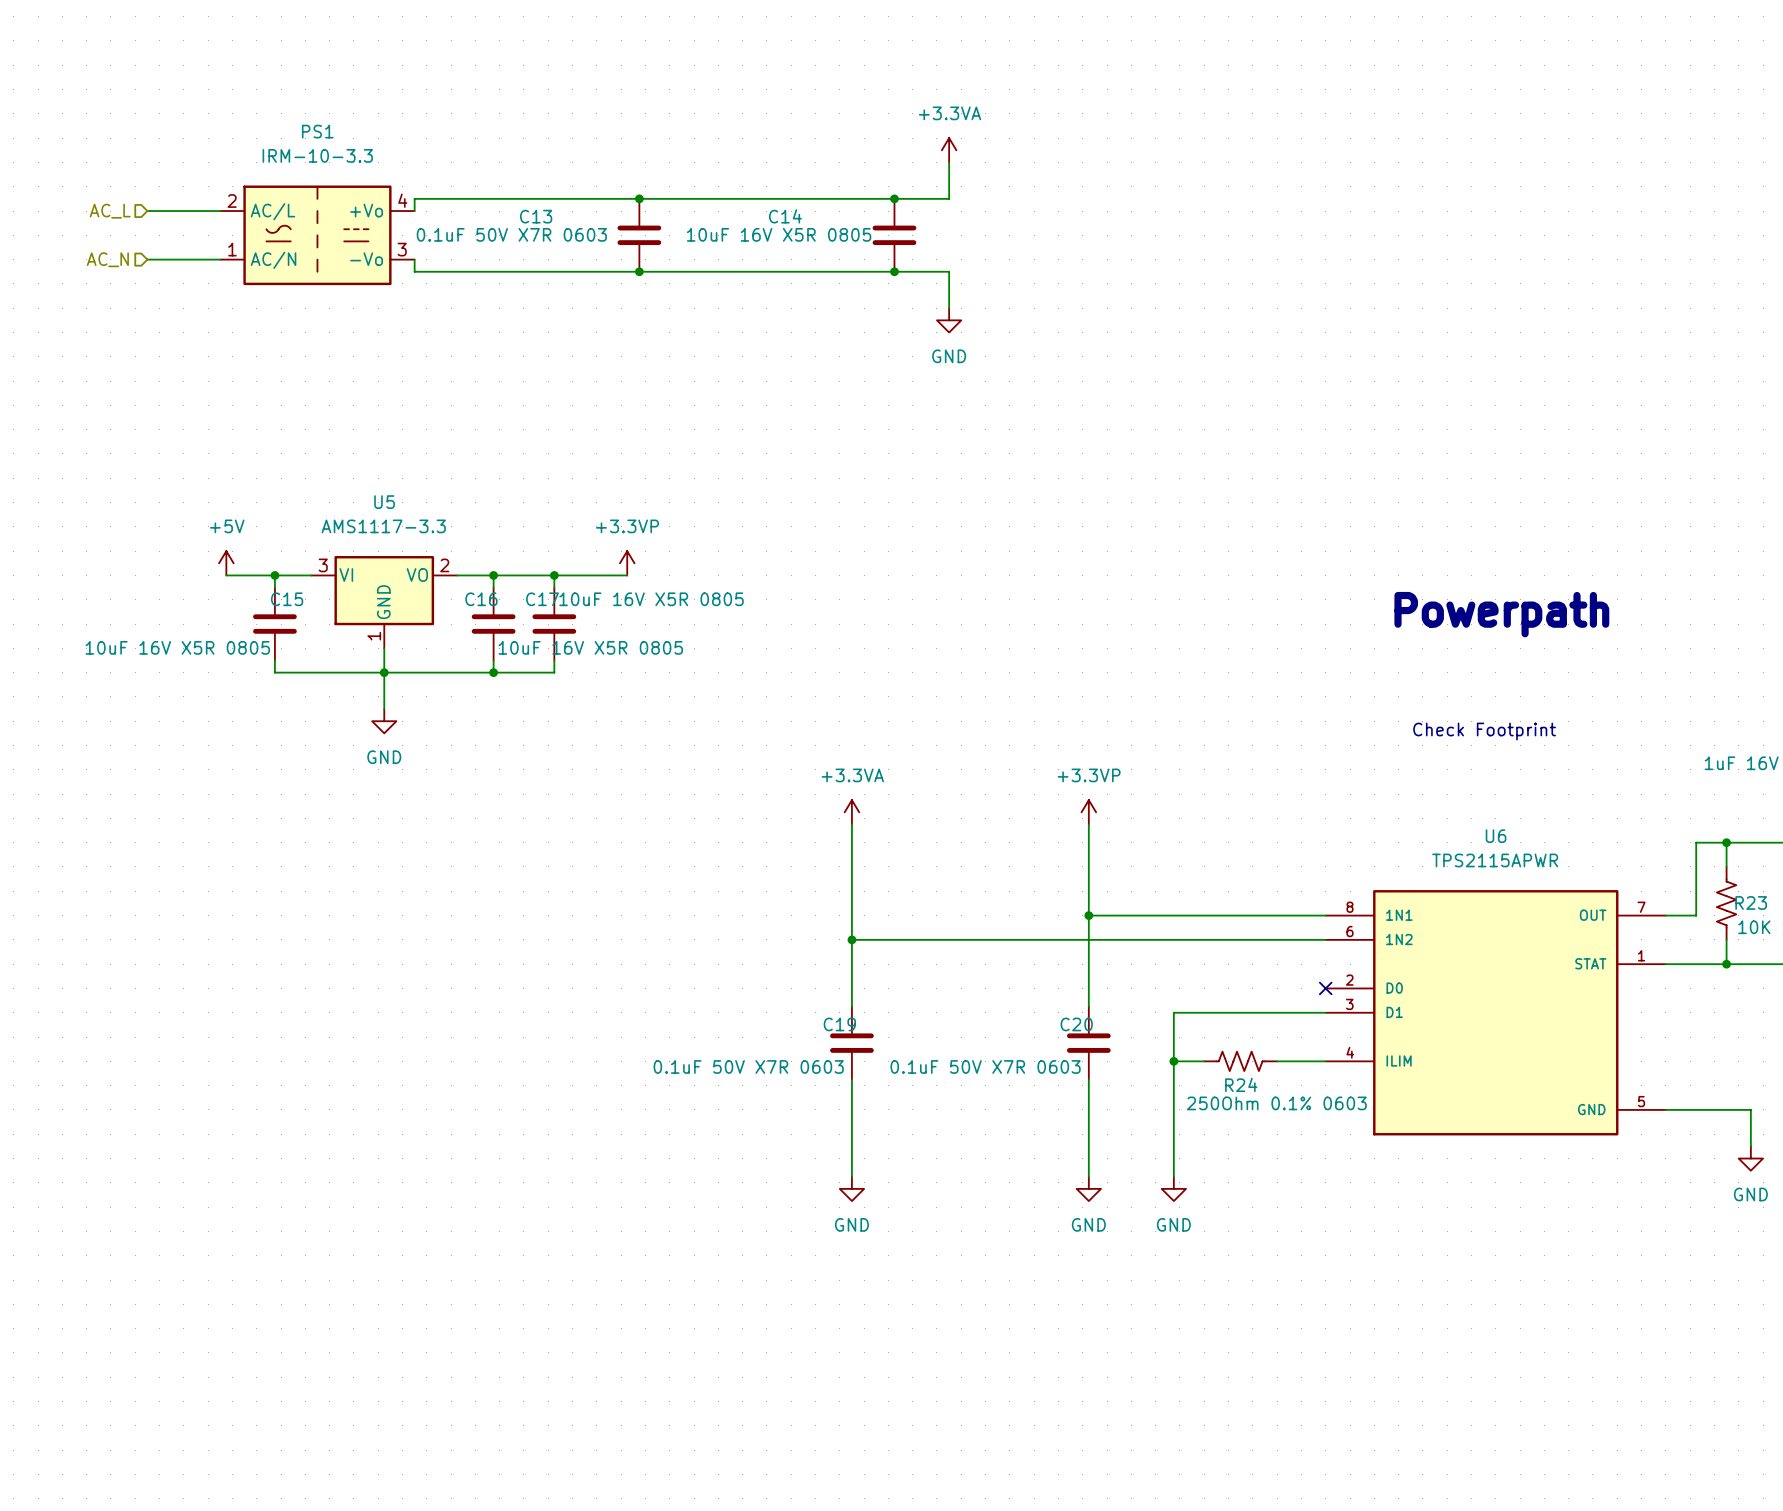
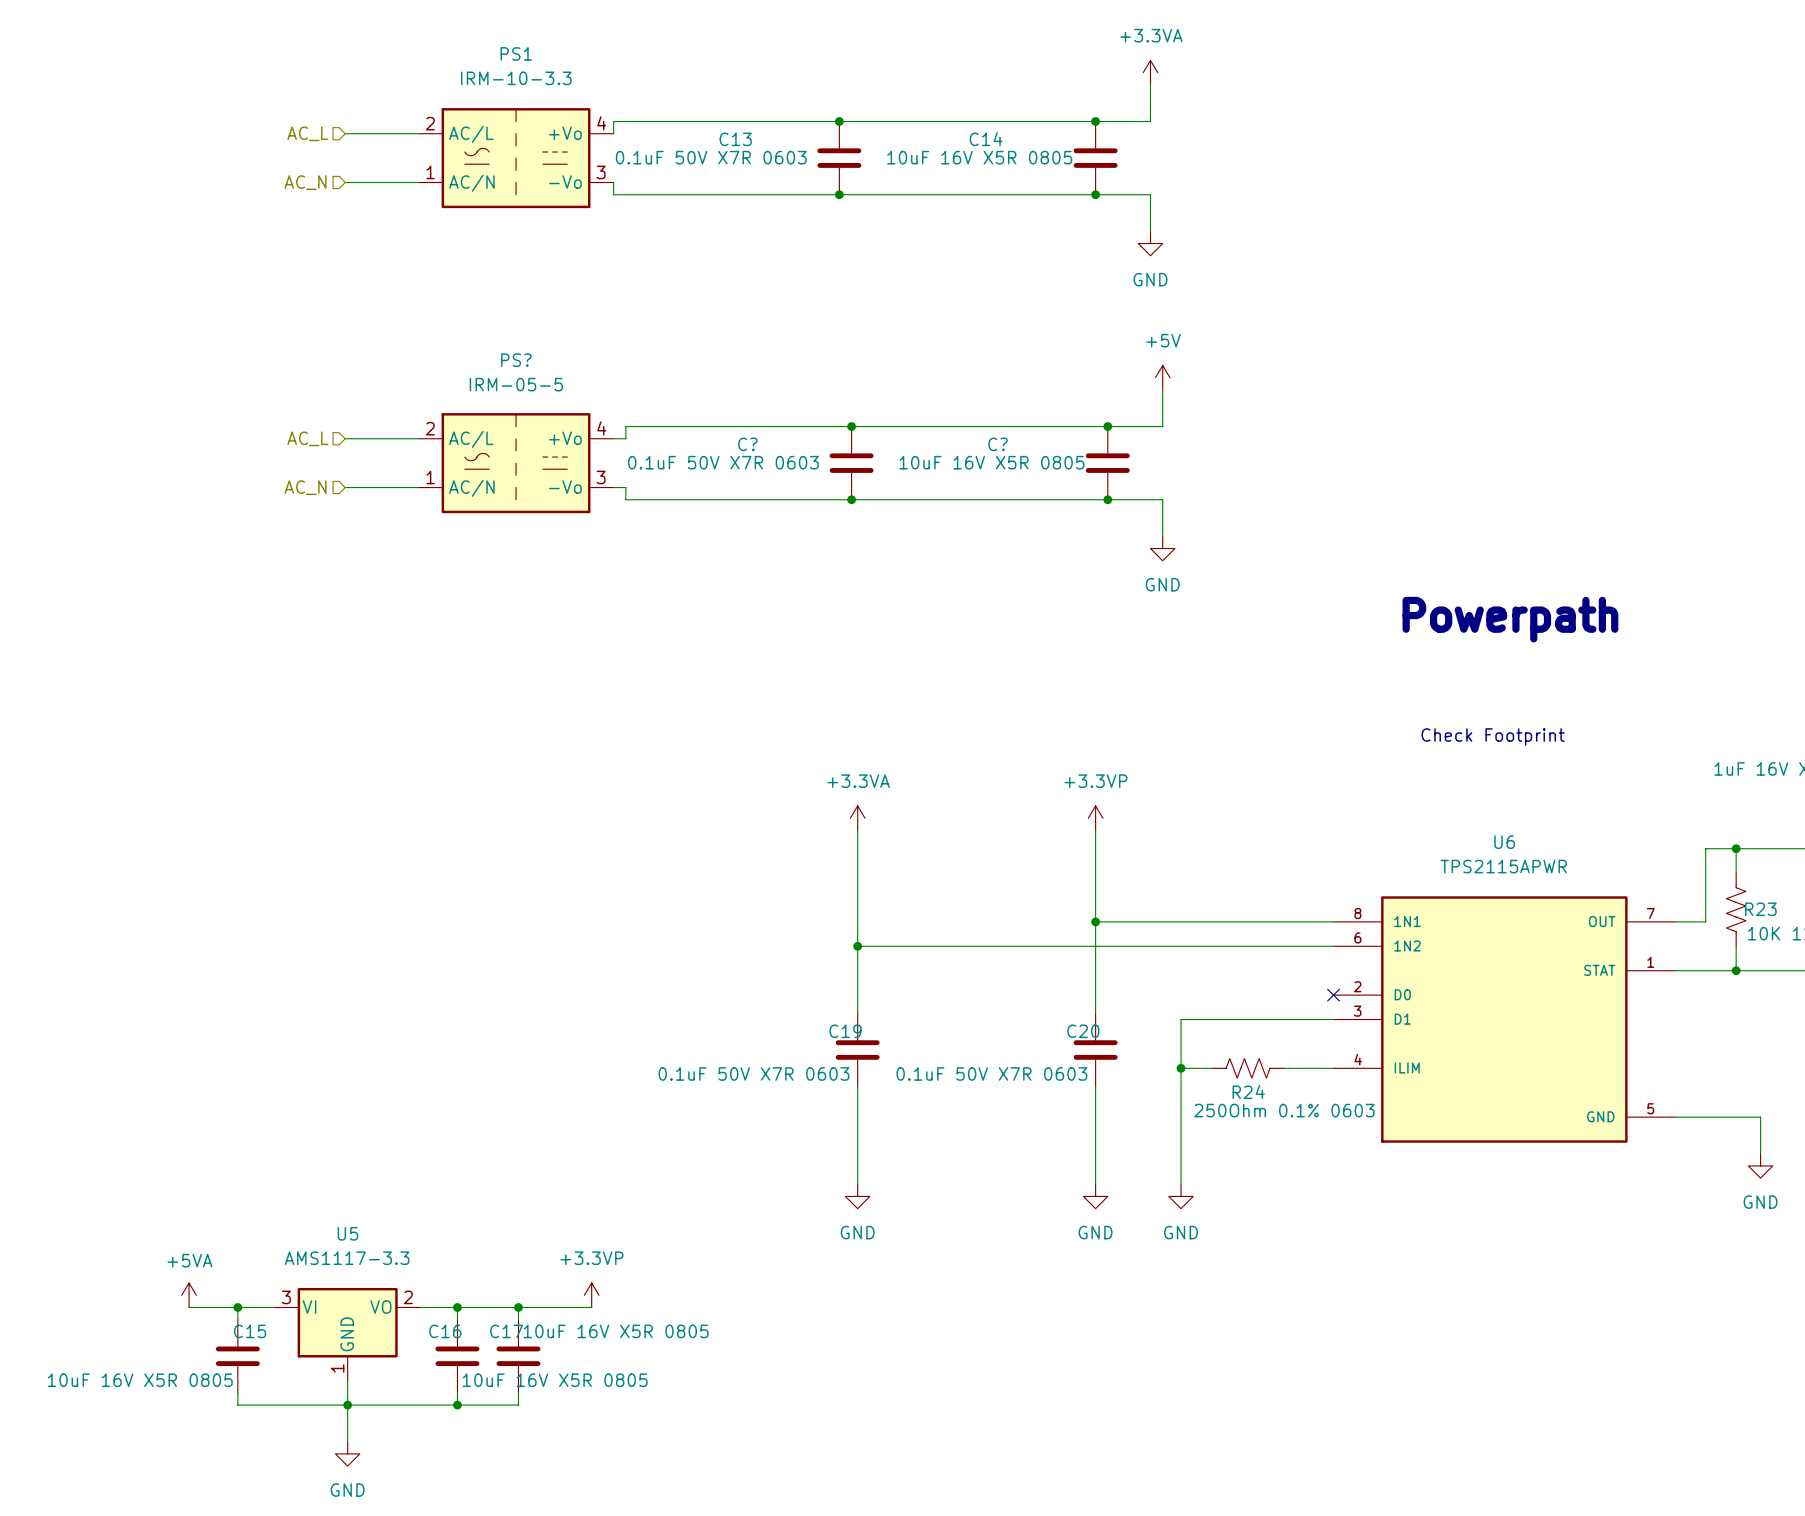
junction: none -> (839, 121)
junction: none -> (1095, 121)
hierarchical label: none -> AC_L (307, 133)
power symbol position: +3.3VA (949, 150) -> +3.3VA (1150, 72)
wire: (949, 162) (949, 198) (414, 198) (414, 211) -> (1150, 84) (1150, 121) (613, 121) (613, 133)
hierarchical label: none -> AC_N (305, 182)
junction: none -> (839, 194)
junction: none -> (1095, 194)
junction: (639, 198) -> none
junction: (894, 198) -> none
hierarchical label: AC_L (110, 211) -> none
wire: (147, 211) (220, 211) -> (345, 133) (418, 133)
PS1 position: (317, 235) -> (516, 158)
C13 position: (639, 235) -> (839, 158)
C14 position: (894, 235) -> (1095, 158)
power symbol: none -> GND (1150, 243)
hierarchical label: AC_N (107, 259) -> none
wire: (147, 259) (220, 259) -> (345, 182) (418, 182)
wire: (414, 259) (414, 271) (949, 271) (949, 308) -> (613, 182) (613, 194) (1150, 194) (1150, 231)
junction: (639, 271) -> none
junction: (894, 271) -> none
power symbol: GND (949, 320) -> none
power symbol: none -> +5V (1162, 377)
wire: none -> (1162, 389) (1162, 426) (625, 426) (625, 438) (613, 438)
junction: none -> (851, 426)
junction: none -> (1107, 426)
hierarchical label: none -> AC_L (307, 438)
wire: none -> (345, 438) (418, 438)
PS?: none -> IRM-05-5 (516, 463)
C?: none -> 0.1uF 50V X7R 0603 (851, 463)
C?: none -> 10uF 16V X5R 0805 (1107, 463)
hierarchical label: none -> AC_N (305, 487)
wire: none -> (345, 487) (418, 487)
wire: none -> (613, 487) (625, 487) (625, 499) (1162, 499) (1162, 536)
junction: none -> (851, 499)
junction: none -> (1107, 499)
power symbol: none -> GND (1162, 548)
power symbol: +5V (226, 563) -> none
power symbol: +3.3VP (627, 563) -> none
wire: (226, 575) (311, 575) -> none
wire: (274, 575) (274, 587) -> none
junction: (274, 575) -> none
wire: (457, 575) (627, 575) -> none
wire: (493, 575) (493, 587) -> none
junction: (493, 575) -> none
wire: (554, 575) (554, 587) -> none
junction: (554, 575) -> none
U5 position: (384, 602) -> (347, 1334)
C15 position: (274, 624) -> (237, 1356)
C16 position: (493, 624) -> (457, 1356)
C17 position: (554, 624) -> (518, 1356)
wire: (384, 648) (384, 709) -> none
wire: (274, 660) (274, 672) (554, 672) (554, 660) -> none
wire: (493, 660) (493, 672) -> none
junction: (384, 672) -> none
junction: (493, 672) -> none
power symbol: GND (384, 721) -> none
power symbol: none -> +5VA (189, 1295)
power symbol: none -> +3.3VP (591, 1295)
wire: none -> (189, 1307) (274, 1307)
wire: none -> (237, 1307) (237, 1319)
junction: none -> (237, 1307)
wire: none -> (420, 1307) (591, 1307)
wire: none -> (457, 1307) (457, 1319)
junction: none -> (457, 1307)
wire: none -> (518, 1307) (518, 1319)
junction: none -> (518, 1307)
wire: none -> (347, 1380) (347, 1441)
wire: none -> (237, 1392) (237, 1405) (518, 1405) (518, 1392)
wire: none -> (457, 1392) (457, 1405)
junction: none -> (347, 1405)
junction: none -> (457, 1405)
power symbol: none -> GND (347, 1453)

